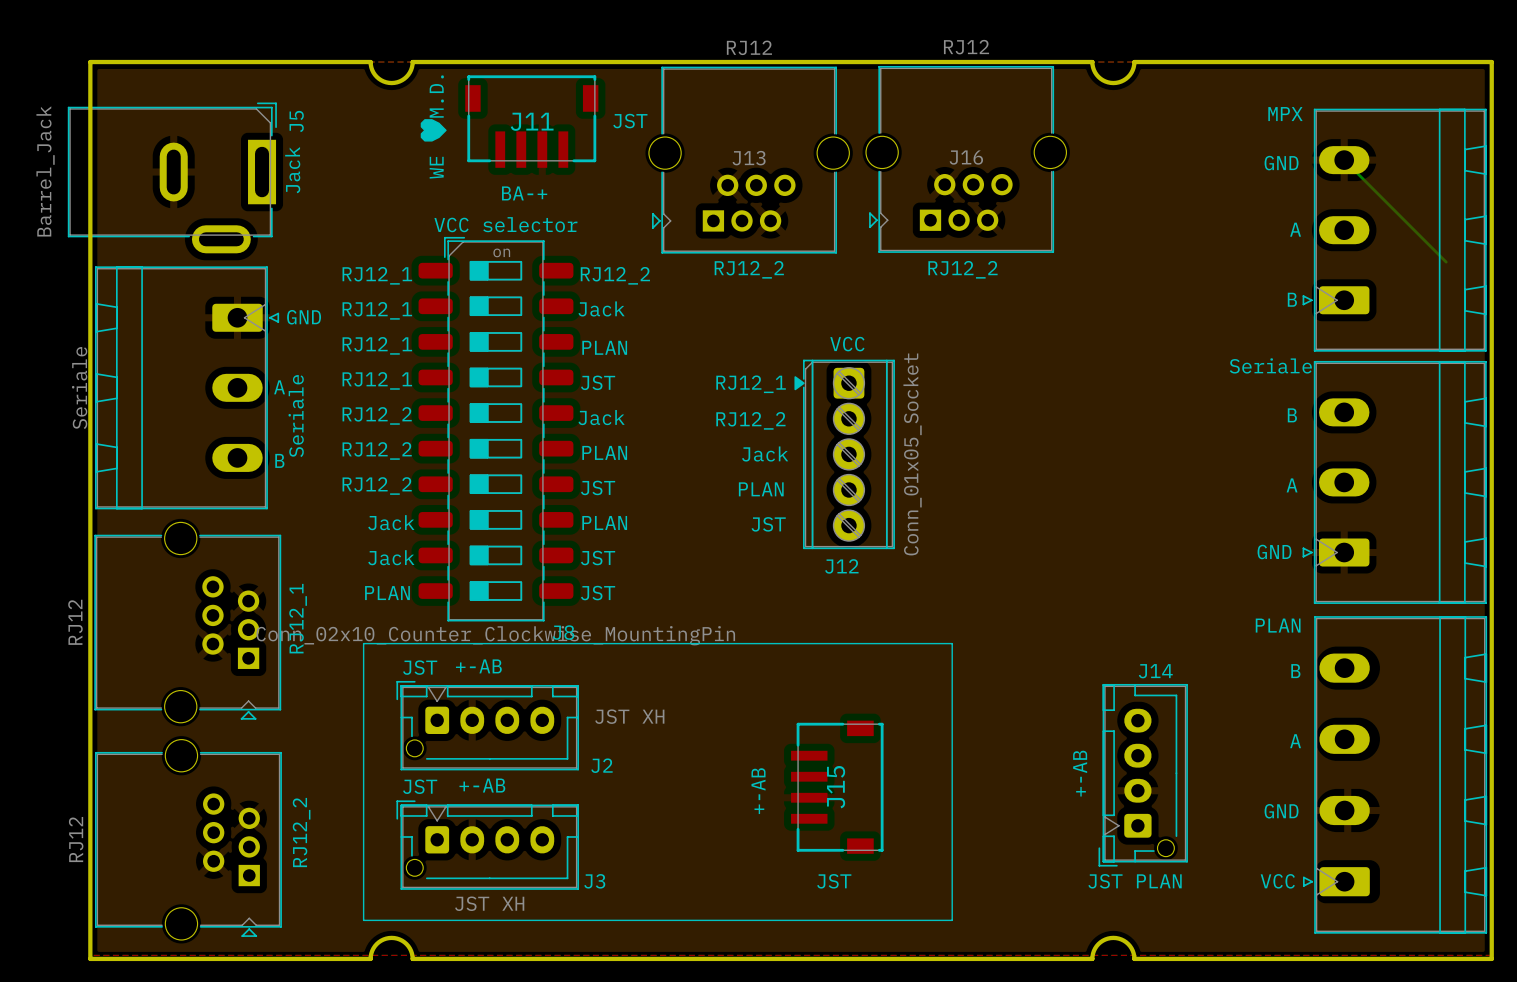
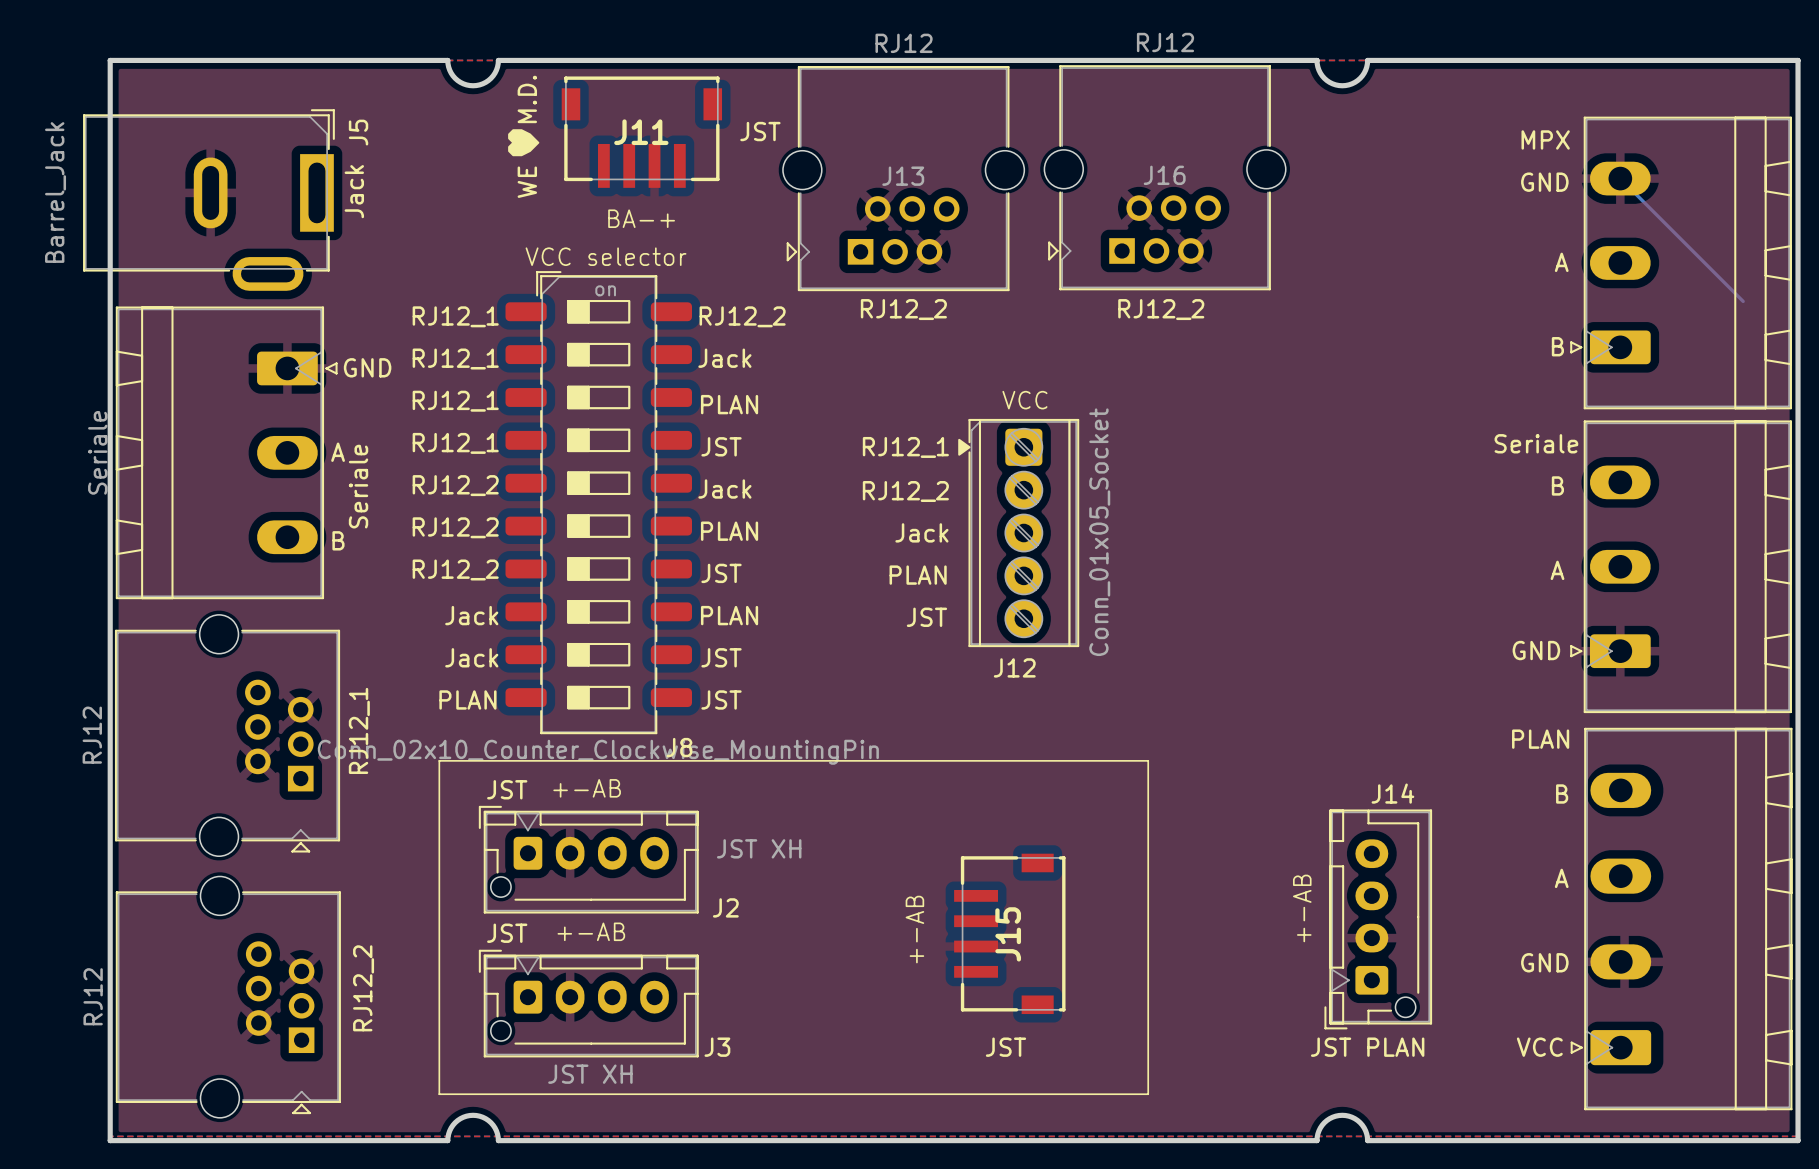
part value position: MPX (1285, 114) -> MPX (1545, 139)
part value position: Seriale (1270, 365) -> Seriale (1536, 443)

